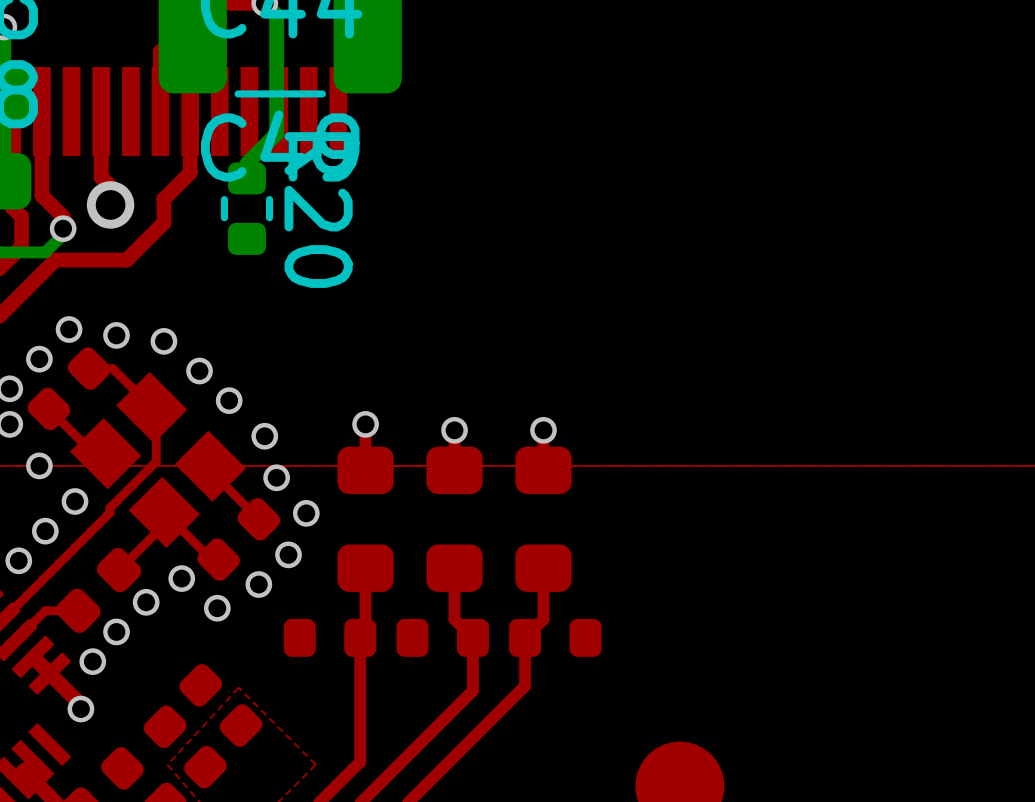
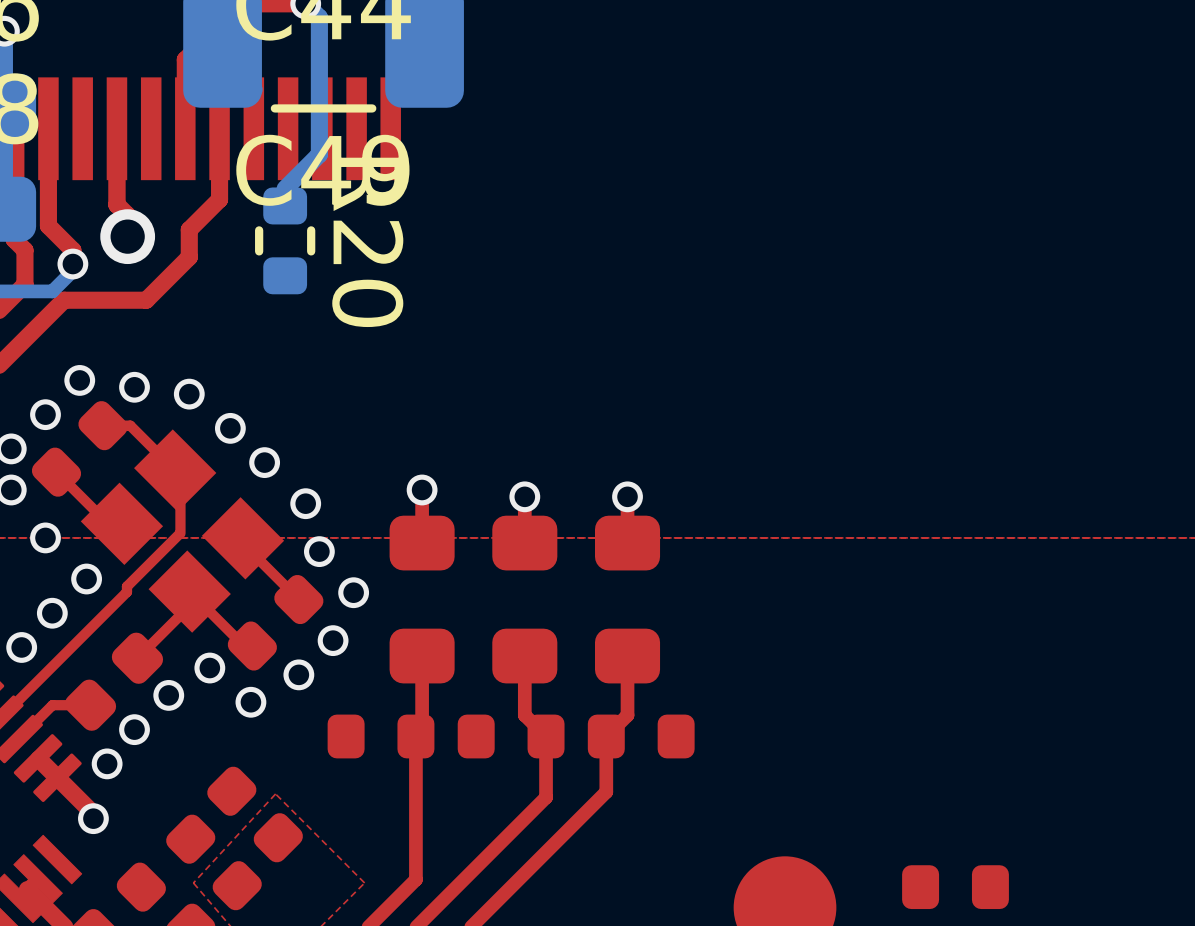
part: none -> (955, 887)

